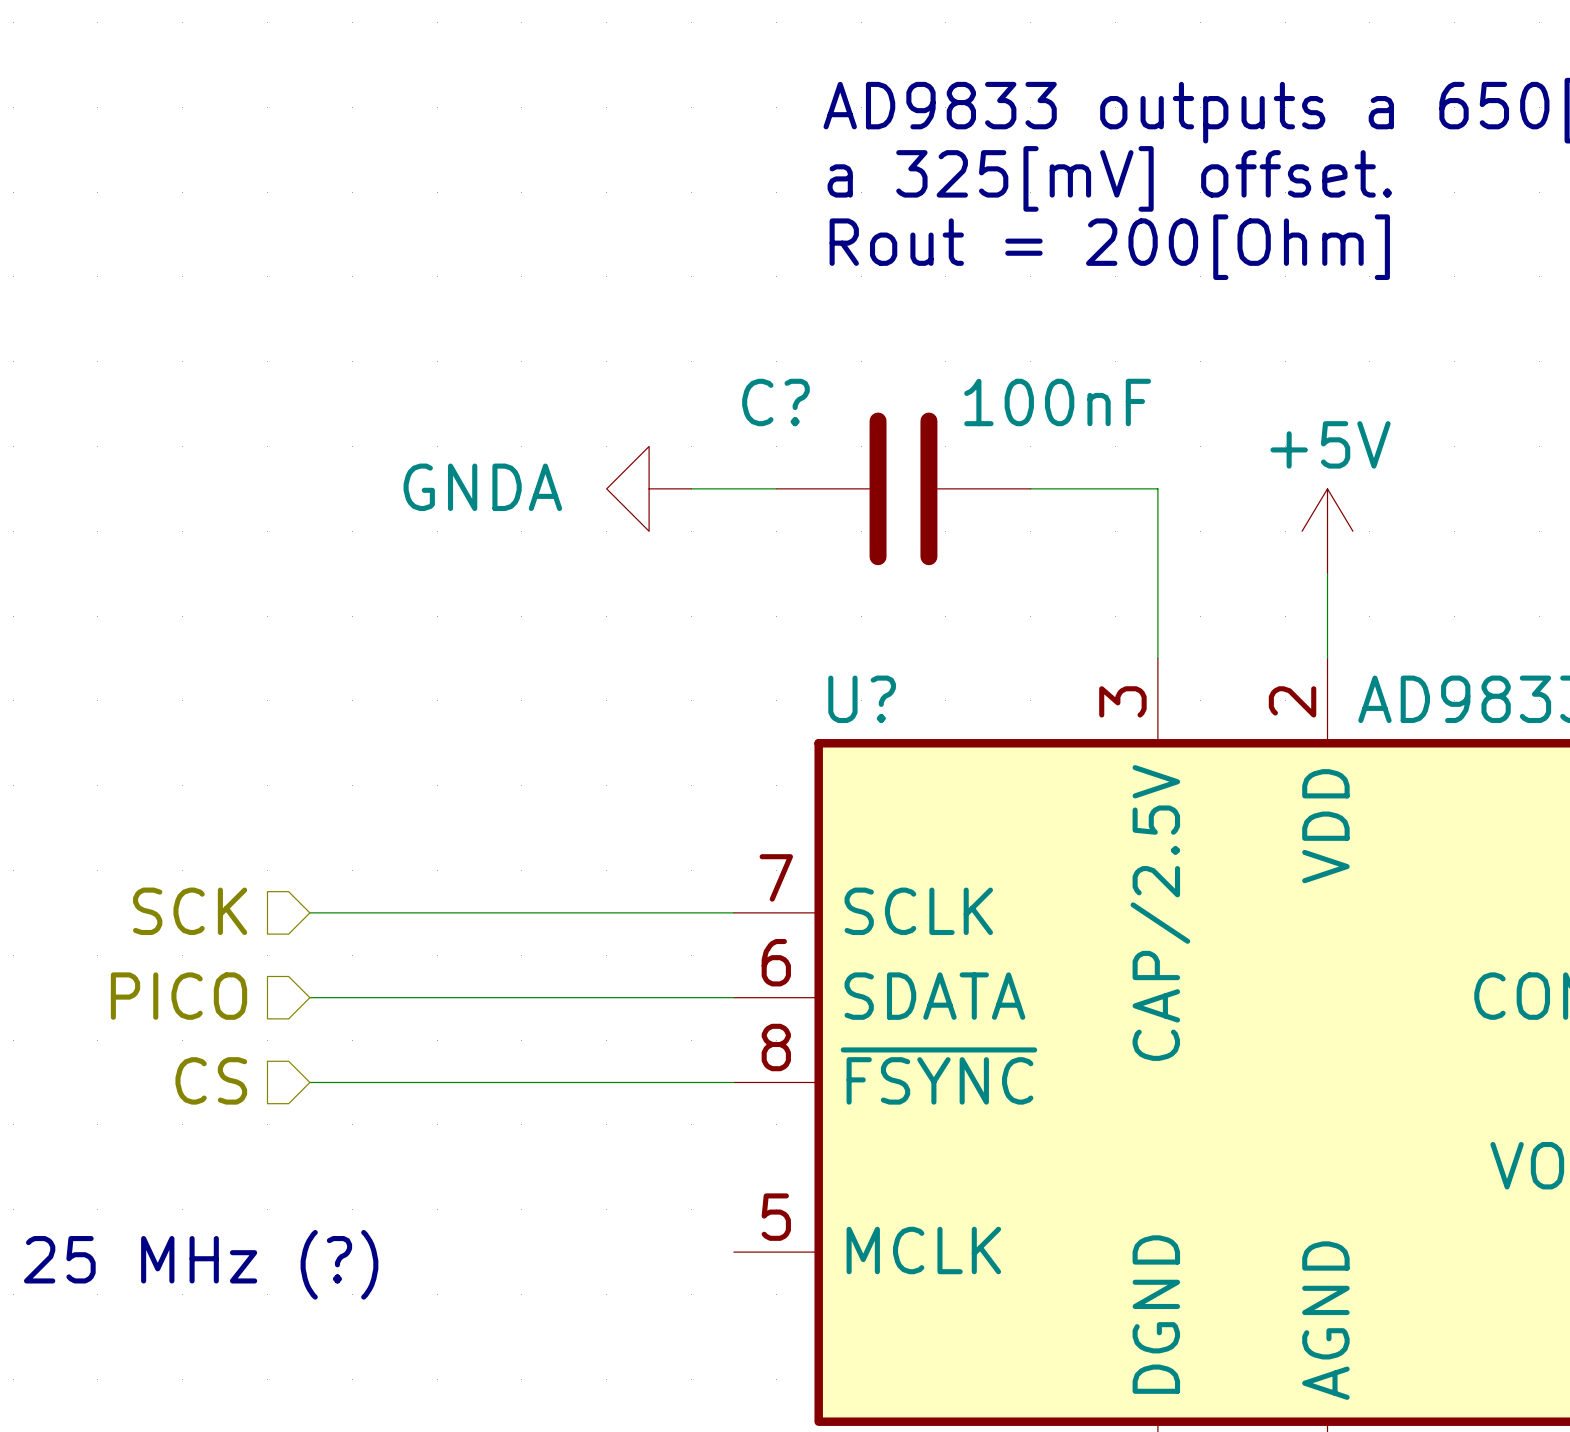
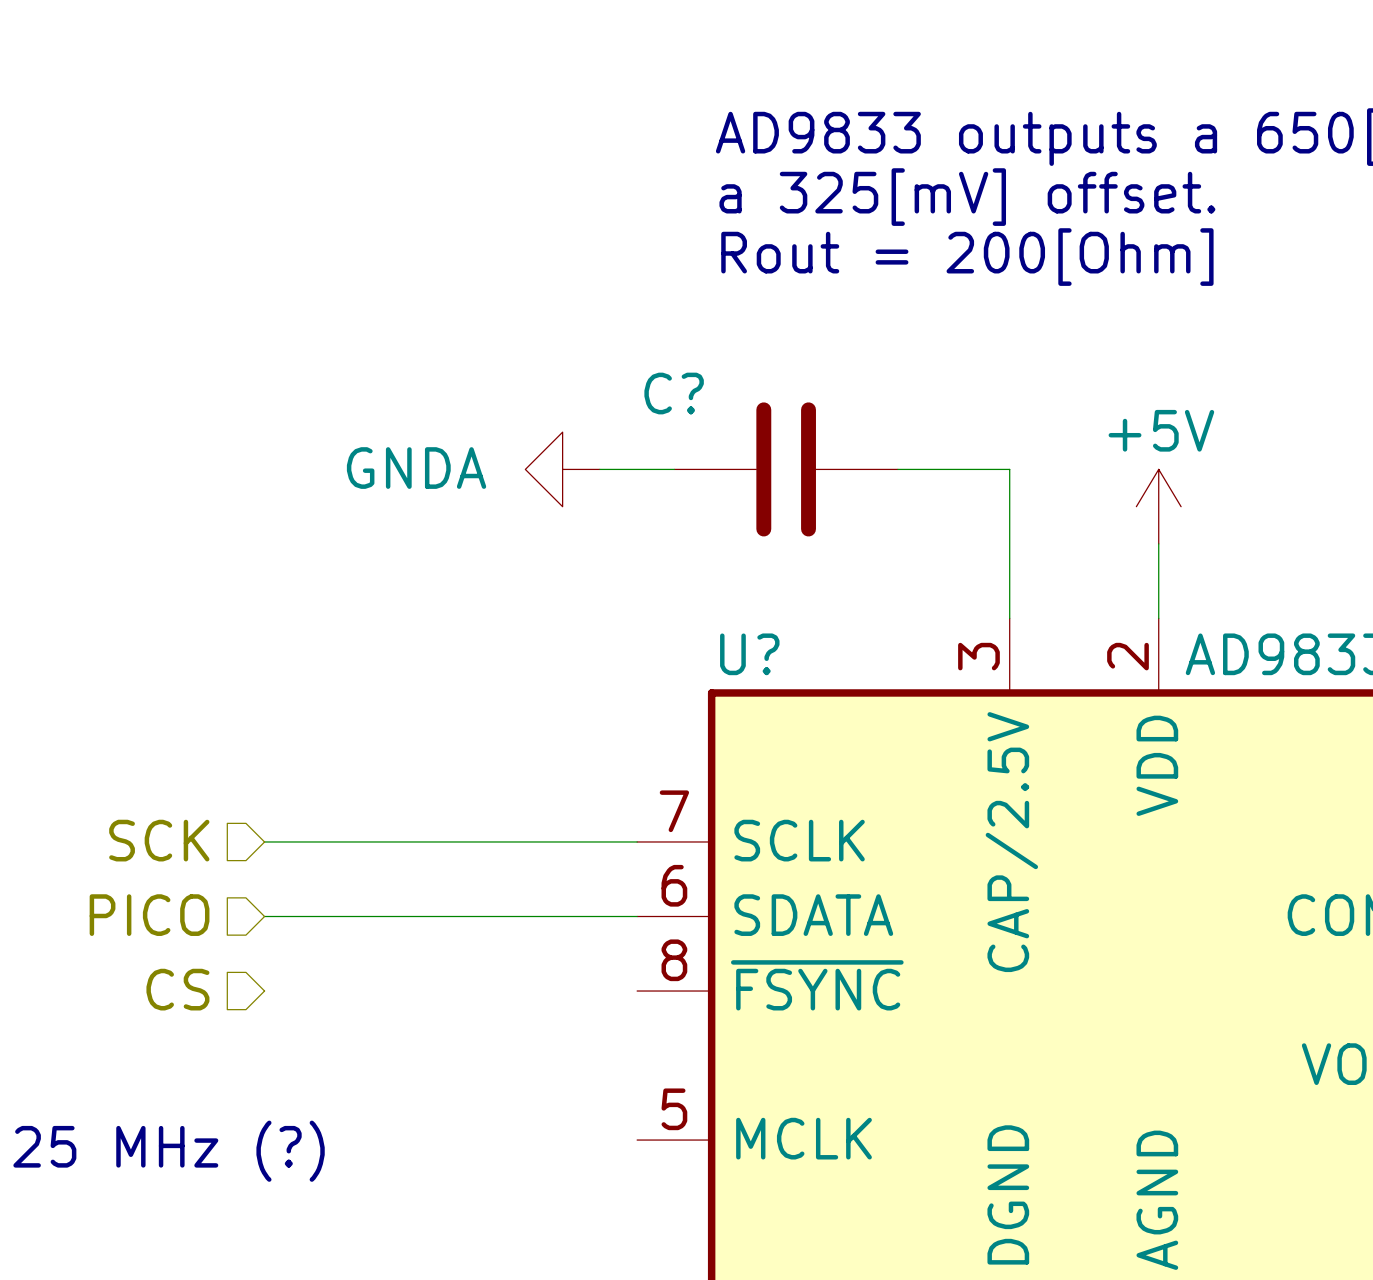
C? value: 100nF (1057, 402) -> none
wire: (309, 1082) (733, 1082) -> none

